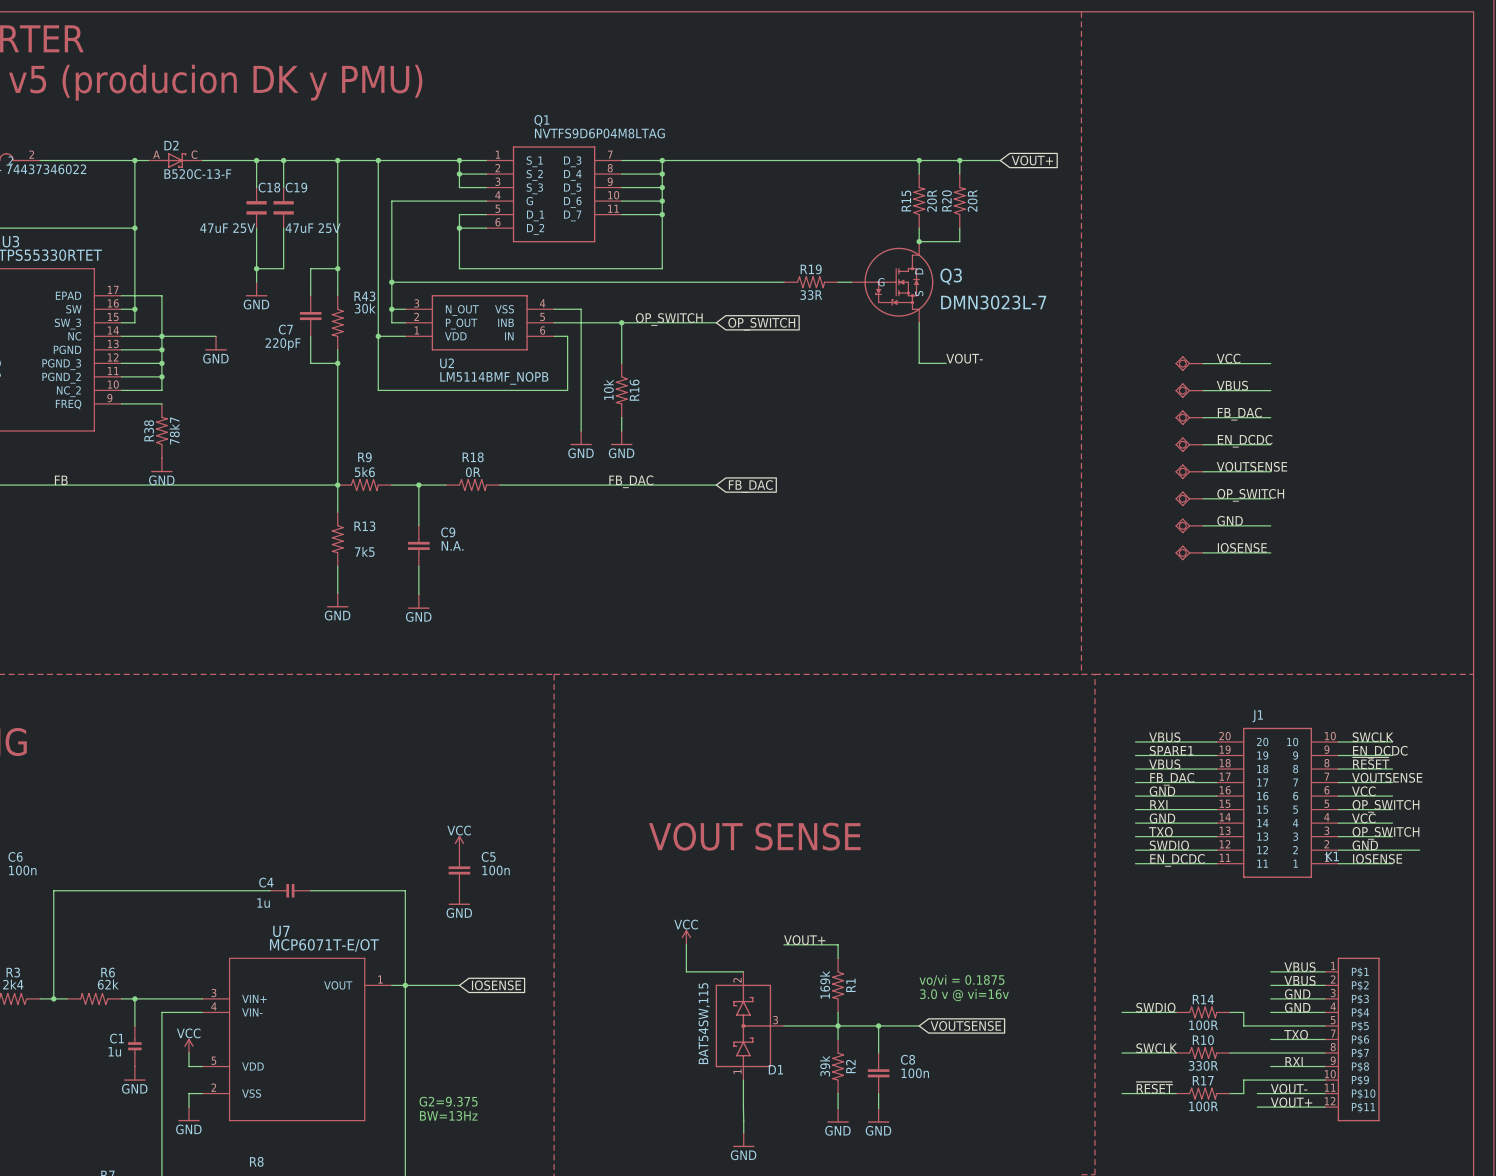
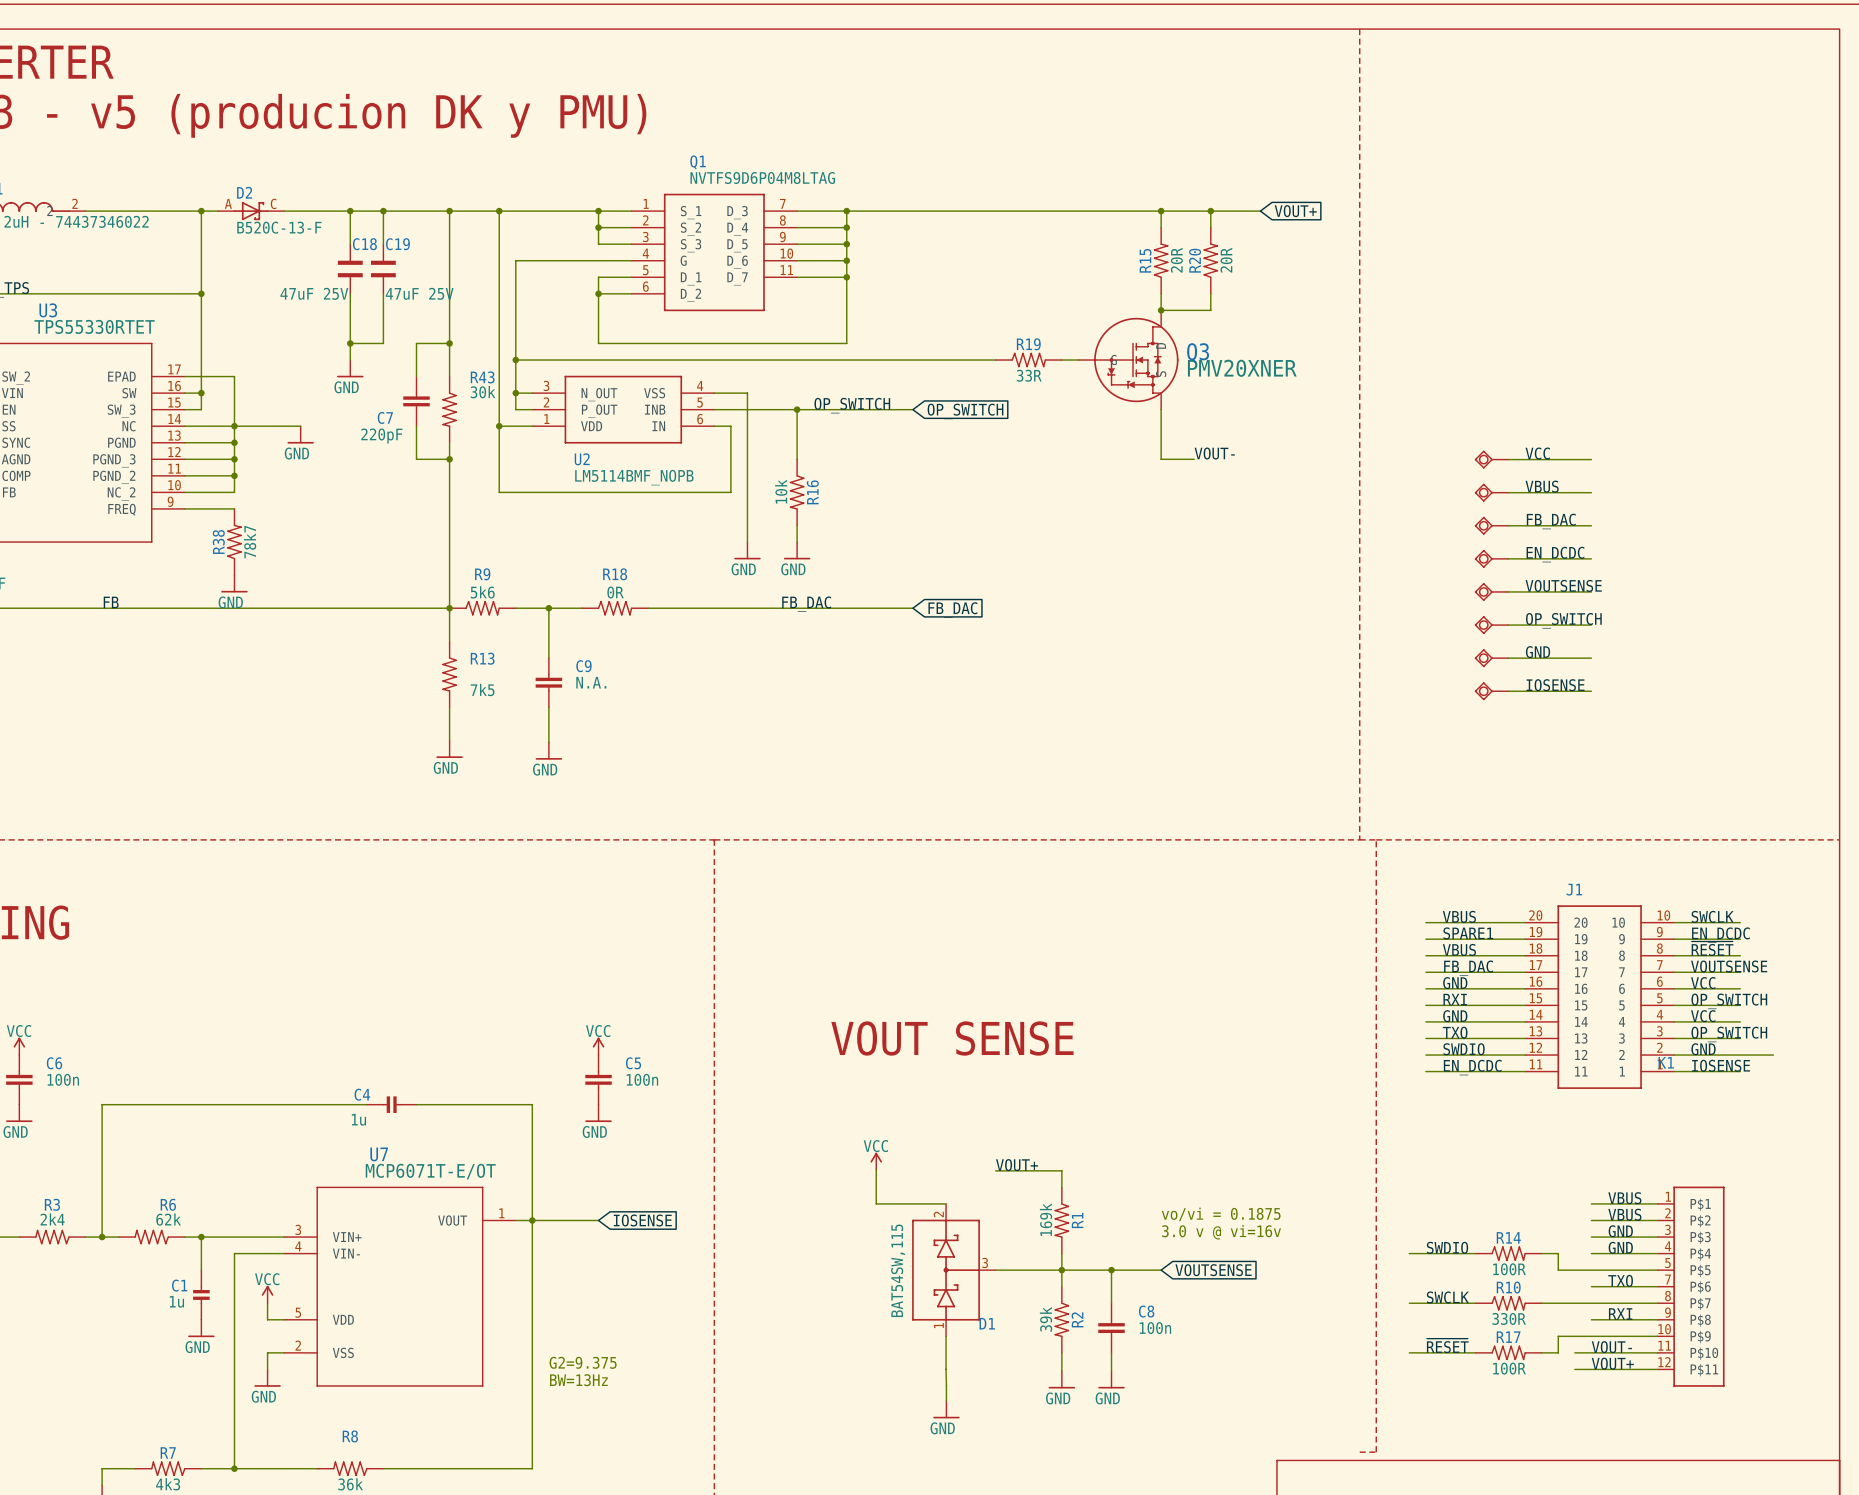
Q3 value: DMN3023L-7 (993, 302) -> PMV20XNER (1242, 368)

